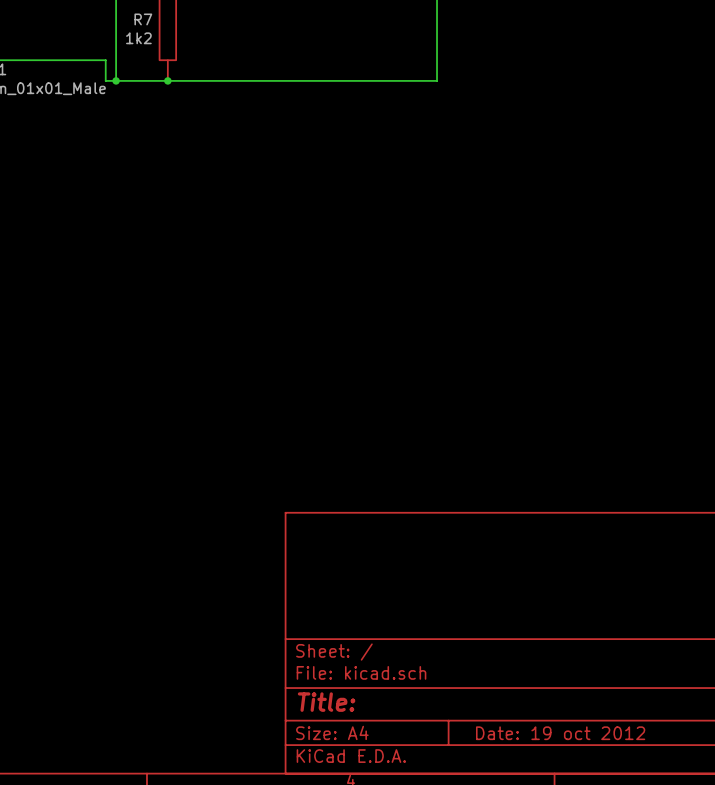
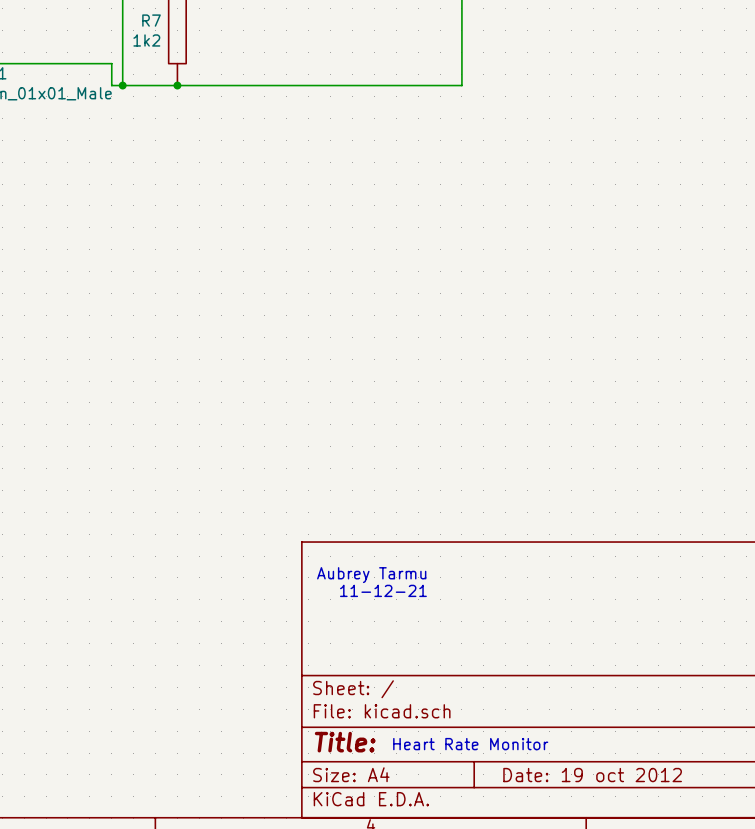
text: none -> Aubrey Tarmu (371, 575)
text: none -> 11-12-21 (383, 590)
text: none -> Heart Rate Monitor (470, 744)

